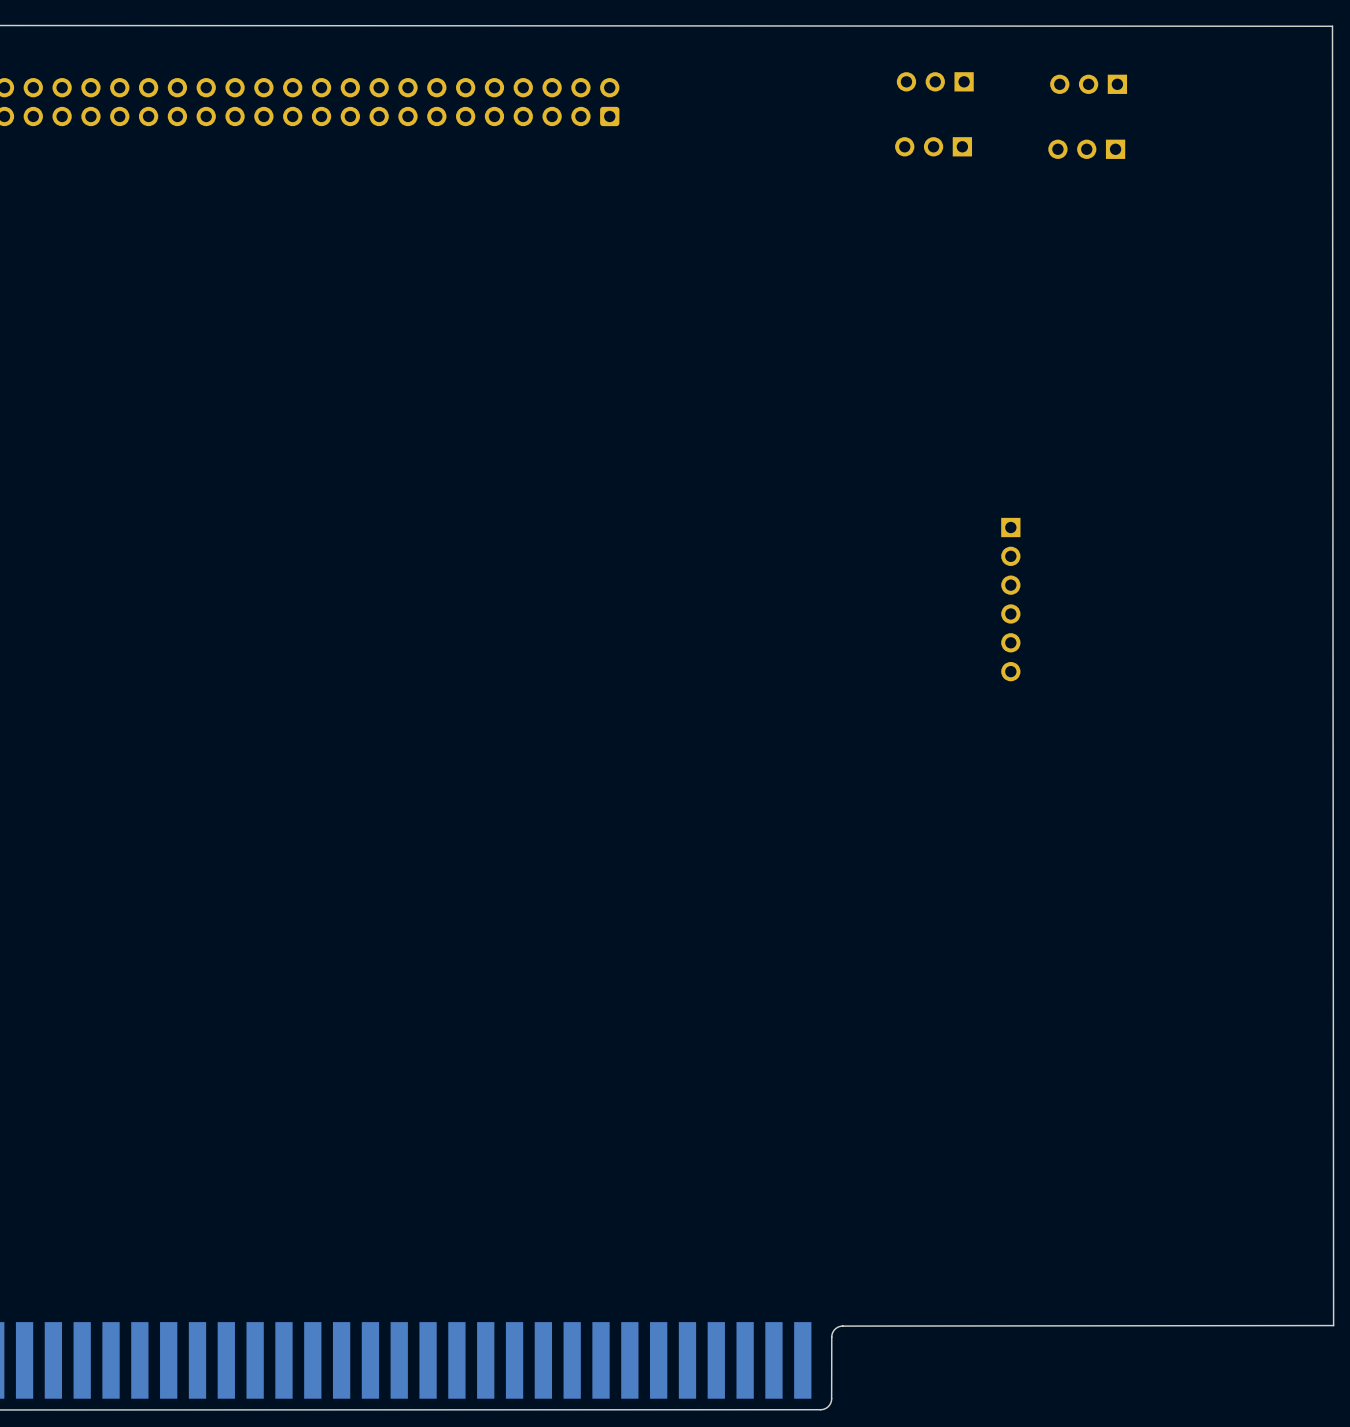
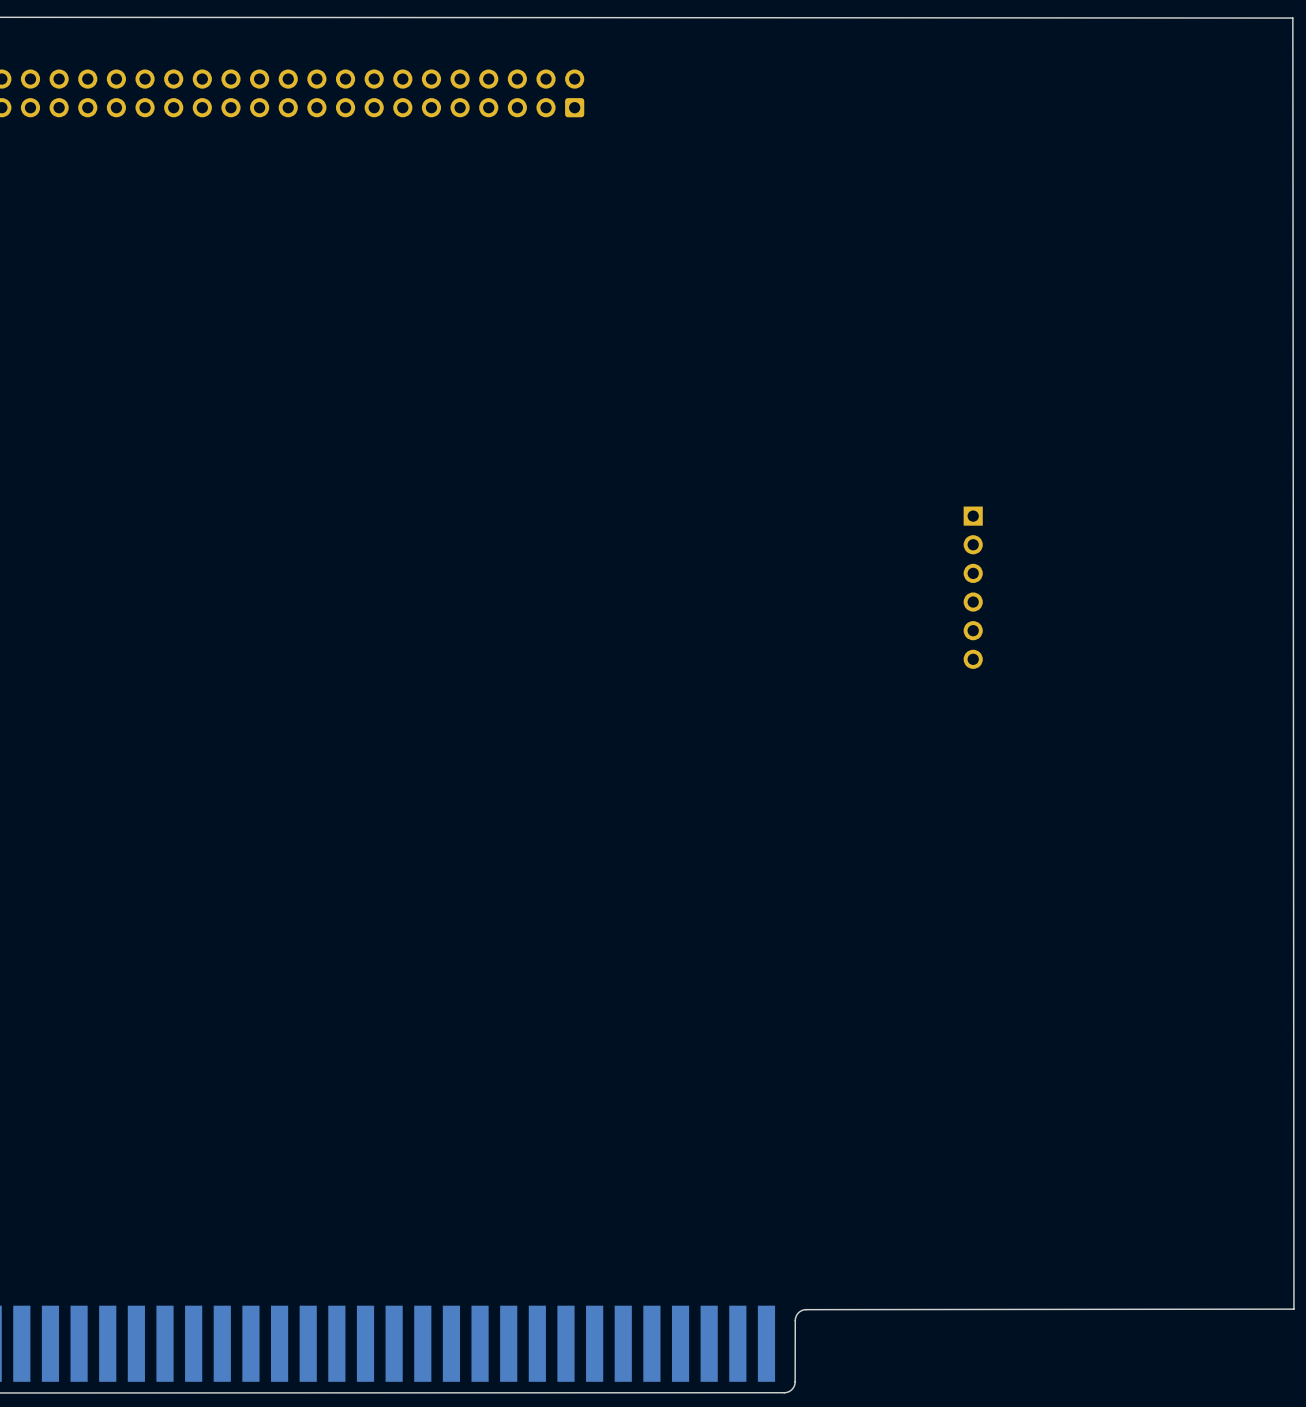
part: (935, 81) -> none
part: (1088, 84) -> none
part: (933, 146) -> none
part: (1086, 149) -> none

